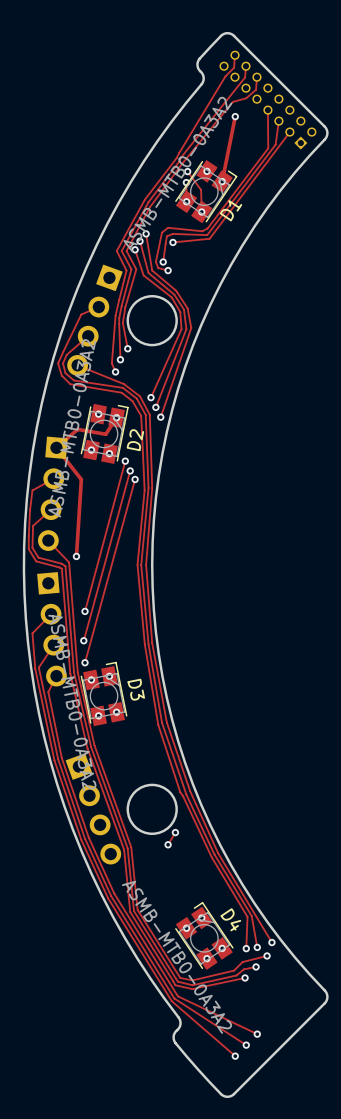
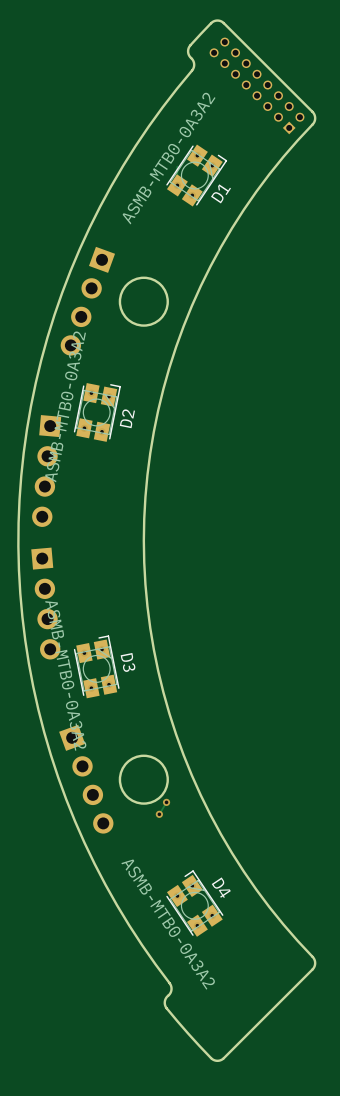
track: (235, 55) (234, 67) (225, 76) (176, 158) (144, 199) (116, 251) (126, 270) (115, 315) (111, 363) (115, 371) -> none
track: (245, 66) (245, 77) (181, 156) (148, 202) (121, 251) (131, 269) (119, 318) (120, 359) -> none
track: (256, 77) (256, 89) (246, 98) (232, 101) (182, 163) (149, 207) (126, 251) (136, 269) (122, 323) (127, 348) -> none
track: (267, 110) (268, 148) (207, 228) (202, 231) (168, 227) (161, 232) (155, 262) (158, 268) (168, 270) -> none
track: (235, 116) (222, 181) -> none
via: (235, 116) -> none
track: (278, 121) (275, 144) (207, 235) (172, 233) (166, 236) (163, 262) -> none
track: (289, 132) (209, 238) (172, 242) -> none
track: (187, 171) (201, 189) (201, 211) -> none
via: (187, 171) -> none
via: (186, 182) -> none
track: (146, 233) (152, 270) (177, 292) (187, 308) (191, 327) (160, 417) -> none
via: (146, 233) -> none
track: (140, 241) (148, 273) (174, 294) (183, 309) (186, 329) (155, 407) -> none
via: (140, 241) -> none
via: (172, 242) -> none
track: (135, 249) (143, 275) (171, 297) (180, 312) (181, 329) (150, 397) -> none
via: (135, 249) -> none
via: (163, 262) -> none
via: (168, 270) -> none
track: (98, 307) (81, 314) (58, 363) (61, 375) (70, 384) (121, 392) (132, 401) (141, 415) (144, 490) (137, 565) (144, 644) (158, 725) (180, 792) (211, 857) (247, 916) (246, 948) -> none
track: (88, 336) (66, 354) (63, 363) (65, 373) (74, 380) (122, 387) (136, 398) (145, 414) (148, 488) (141, 565) (148, 644) (161, 722) (186, 794) (214, 854) (251, 916) (257, 947) -> none
via: (127, 348) -> none
via: (120, 359) -> none
track: (77, 365) (124, 384) (140, 396) (149, 414) (152, 488) (146, 565) (152, 643) (166, 722) (190, 791) (218, 853) (271, 942) -> none
via: (115, 371) -> none
via: (150, 397) -> none
via: (155, 407) -> none
track: (116, 417) (105, 434) (77, 429) (56, 447) (81, 479) (76, 556) -> none
via: (160, 417) -> none
track: (125, 461) (85, 611) -> none
via: (125, 461) -> none
track: (130, 470) (83, 640) -> none
via: (130, 470) -> none
track: (53, 478) (32, 490) (28, 549) (36, 561) (61, 568) (70, 673) (87, 748) (124, 849) (130, 911) (175, 985) (192, 989) (245, 977) -> none
track: (135, 479) (85, 662) -> none
via: (135, 479) -> none
track: (51, 509) (33, 525) (32, 547) (38, 557) (65, 566) (74, 672) (91, 747) (127, 848) (134, 911) (177, 981) (192, 985) (236, 975) (243, 969) (256, 966) -> none
track: (48, 540) (69, 562) (77, 672) (94, 745) (131, 847) (137, 909) (180, 977) (192, 980) (234, 970) (242, 962) (267, 955) -> none
via: (76, 556) -> none
via: (85, 611) -> none
track: (51, 614) (32, 633) (35, 668) (54, 760) (81, 839) (108, 898) (171, 1001) (235, 1056) -> none
via: (83, 640) -> none
track: (53, 645) (38, 667) (58, 759) (85, 838) (111, 895) (174, 998) (246, 1045) -> none
via: (85, 662) -> none
track: (56, 676) (48, 692) (61, 758) (88, 837) (114, 893) (177, 996) (257, 1034) -> none
via: (271, 942) -> none
via: (257, 947) -> none
via: (246, 948) -> none
via: (267, 955) -> none
via: (256, 966) -> none
via: (245, 977) -> none
via: (257, 1034) -> none
via: (246, 1045) -> none
via: (235, 1056) -> none

